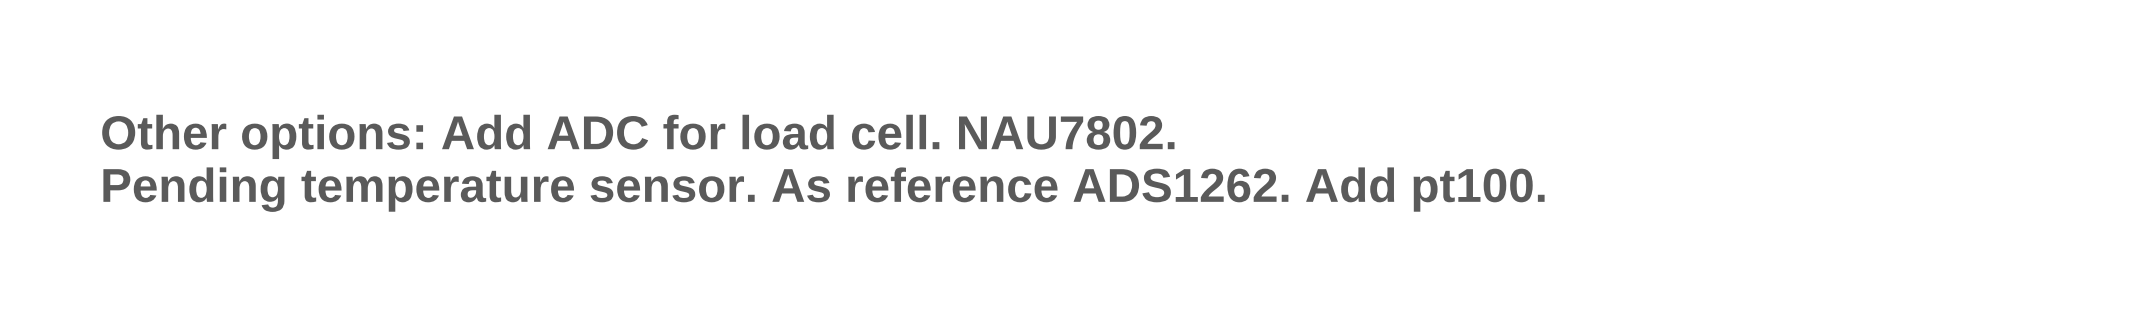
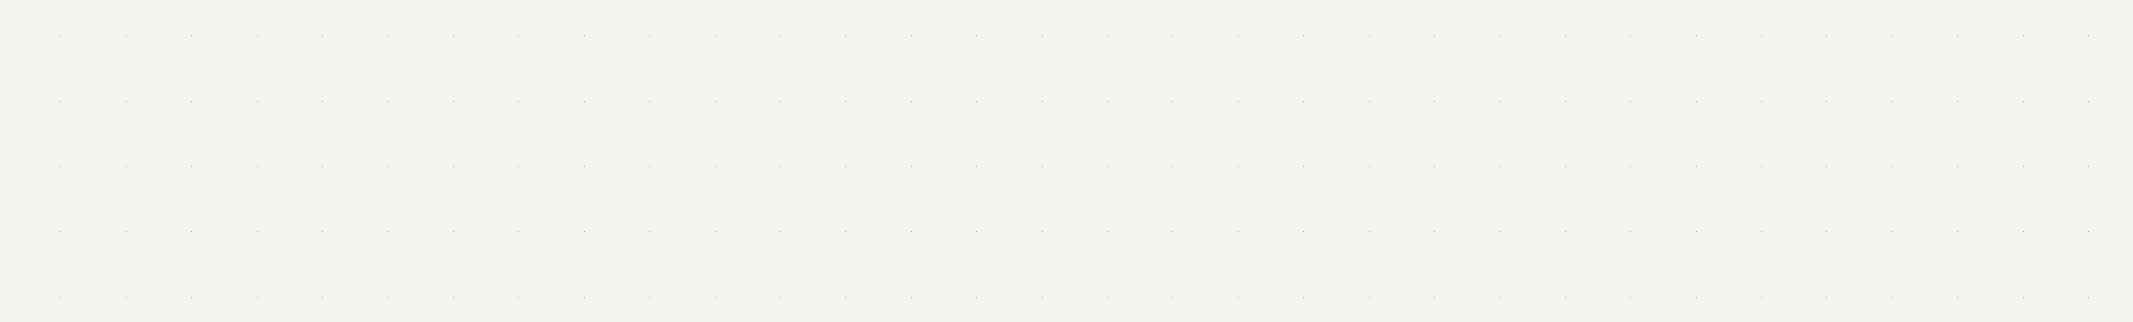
text: Other options: Add ADC for load cell. NAU7802. (638, 136) -> none
text: Pending temperature sensor. As reference ADS1262. Add pt100. (824, 189) -> none

